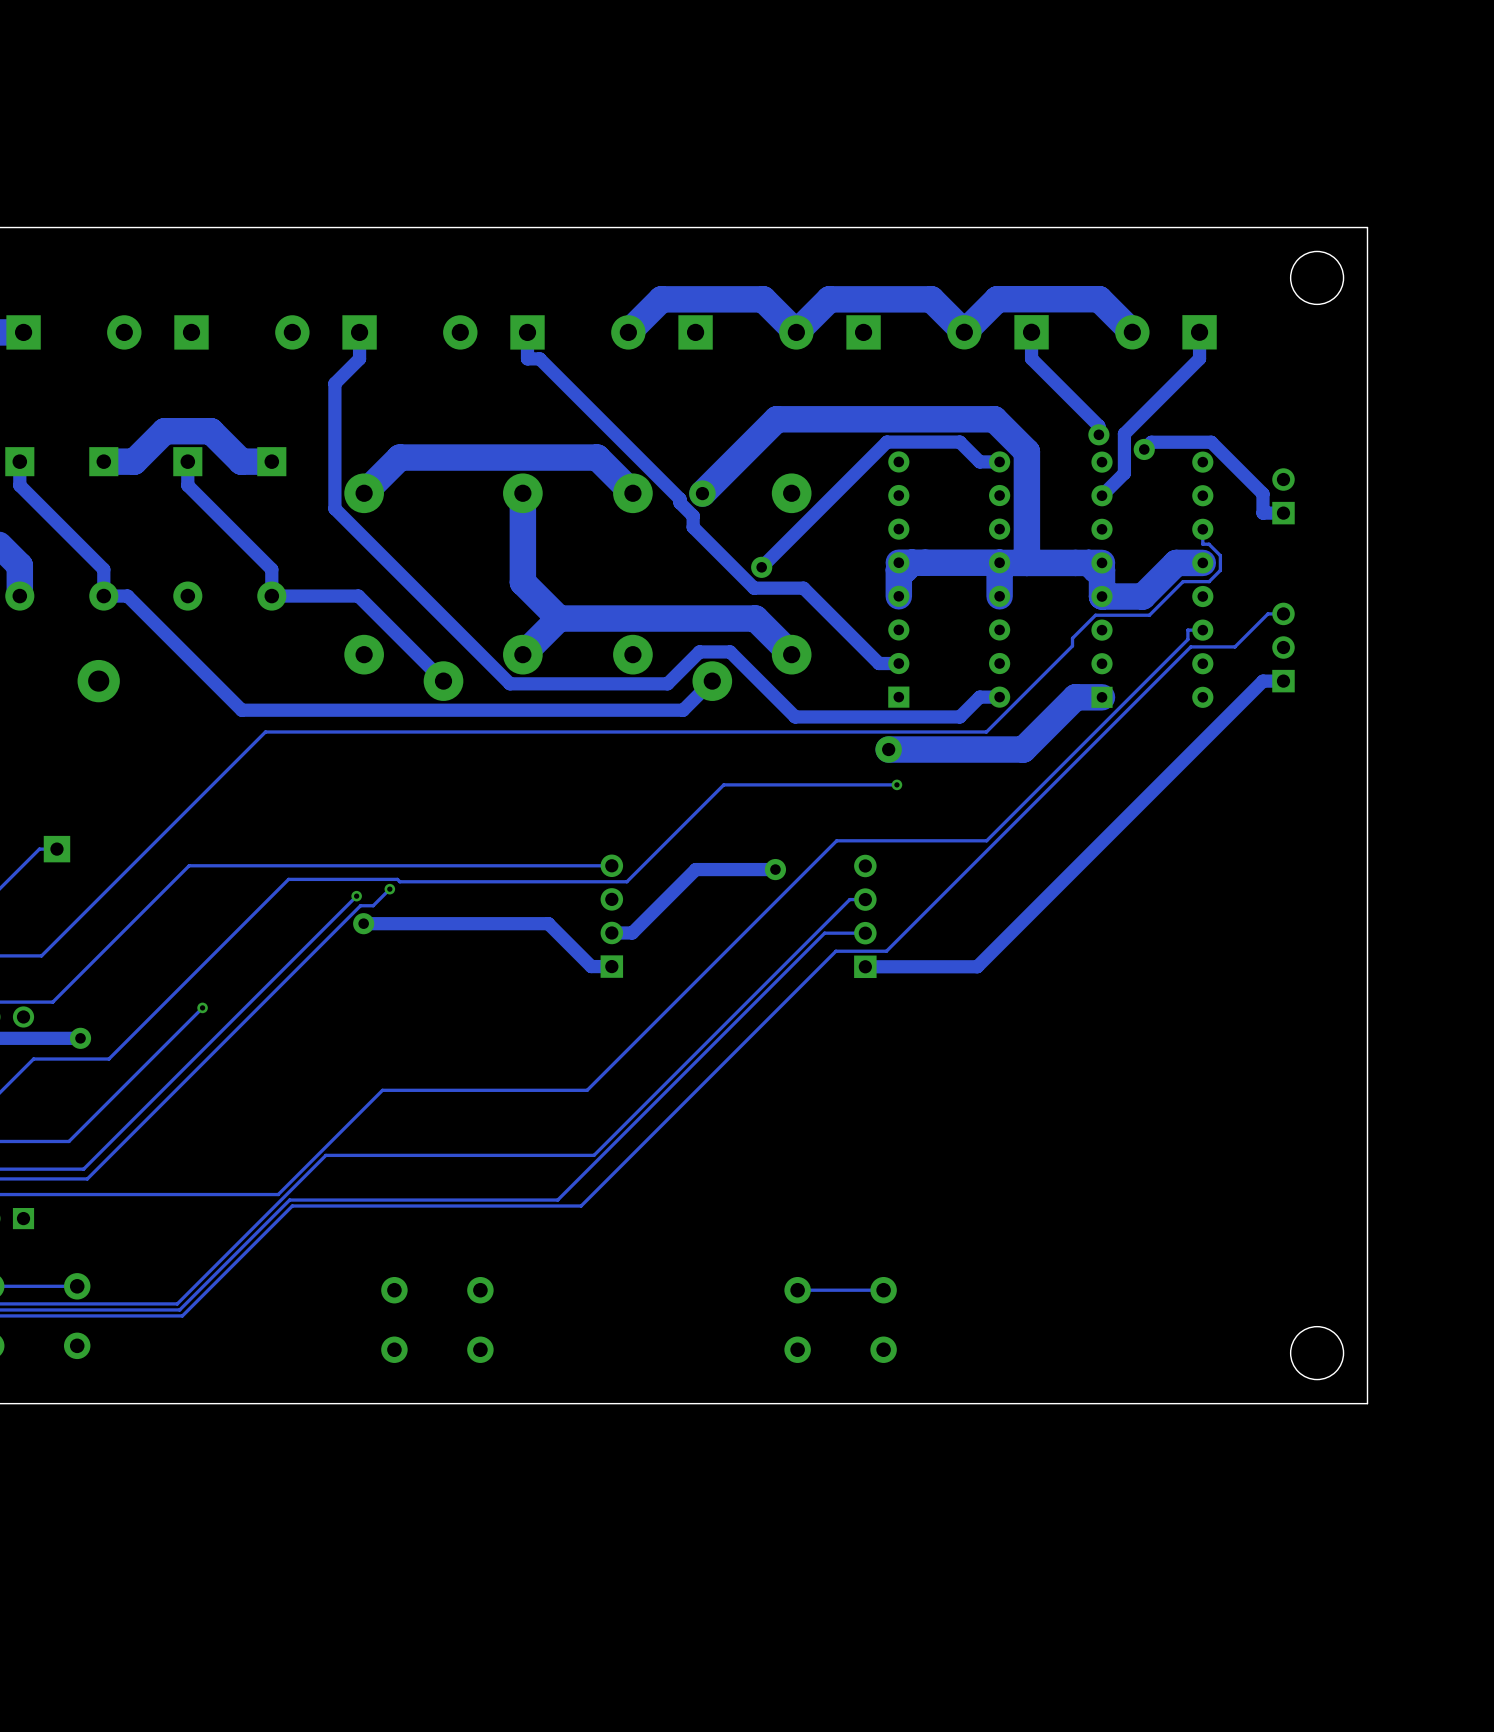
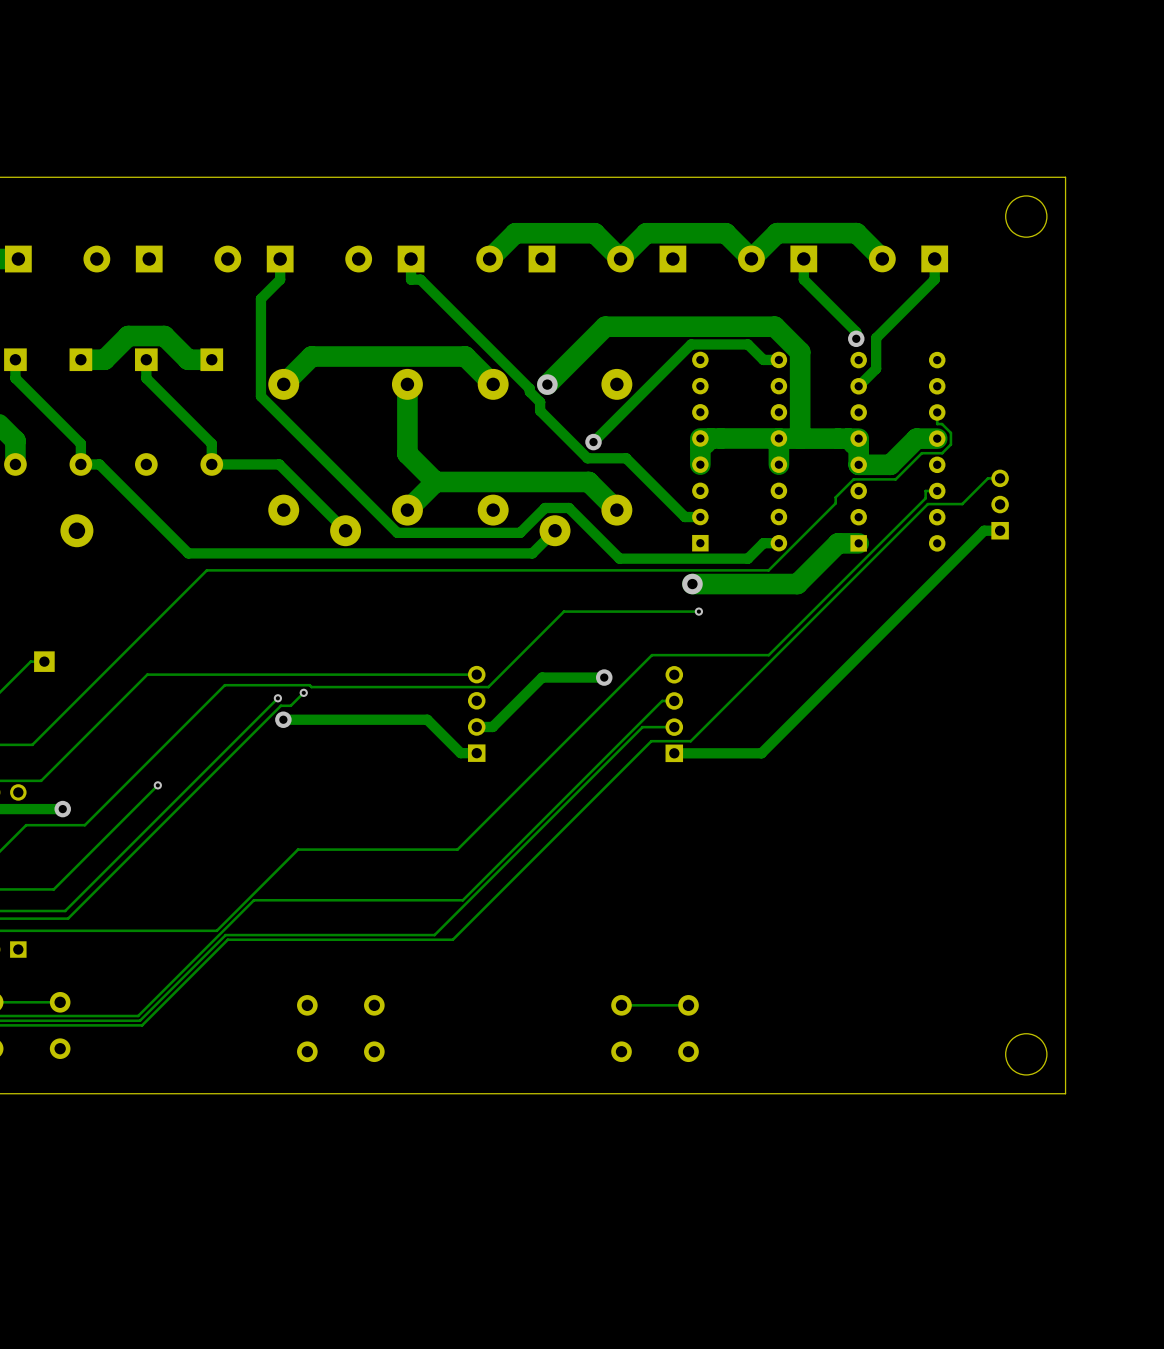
track: (1144, 449) (1151, 442) (1211, 442) (1262, 493) (1262, 513) (1283, 513) -> none
via: (1144, 449) -> none
part: (1283, 496) -> none

